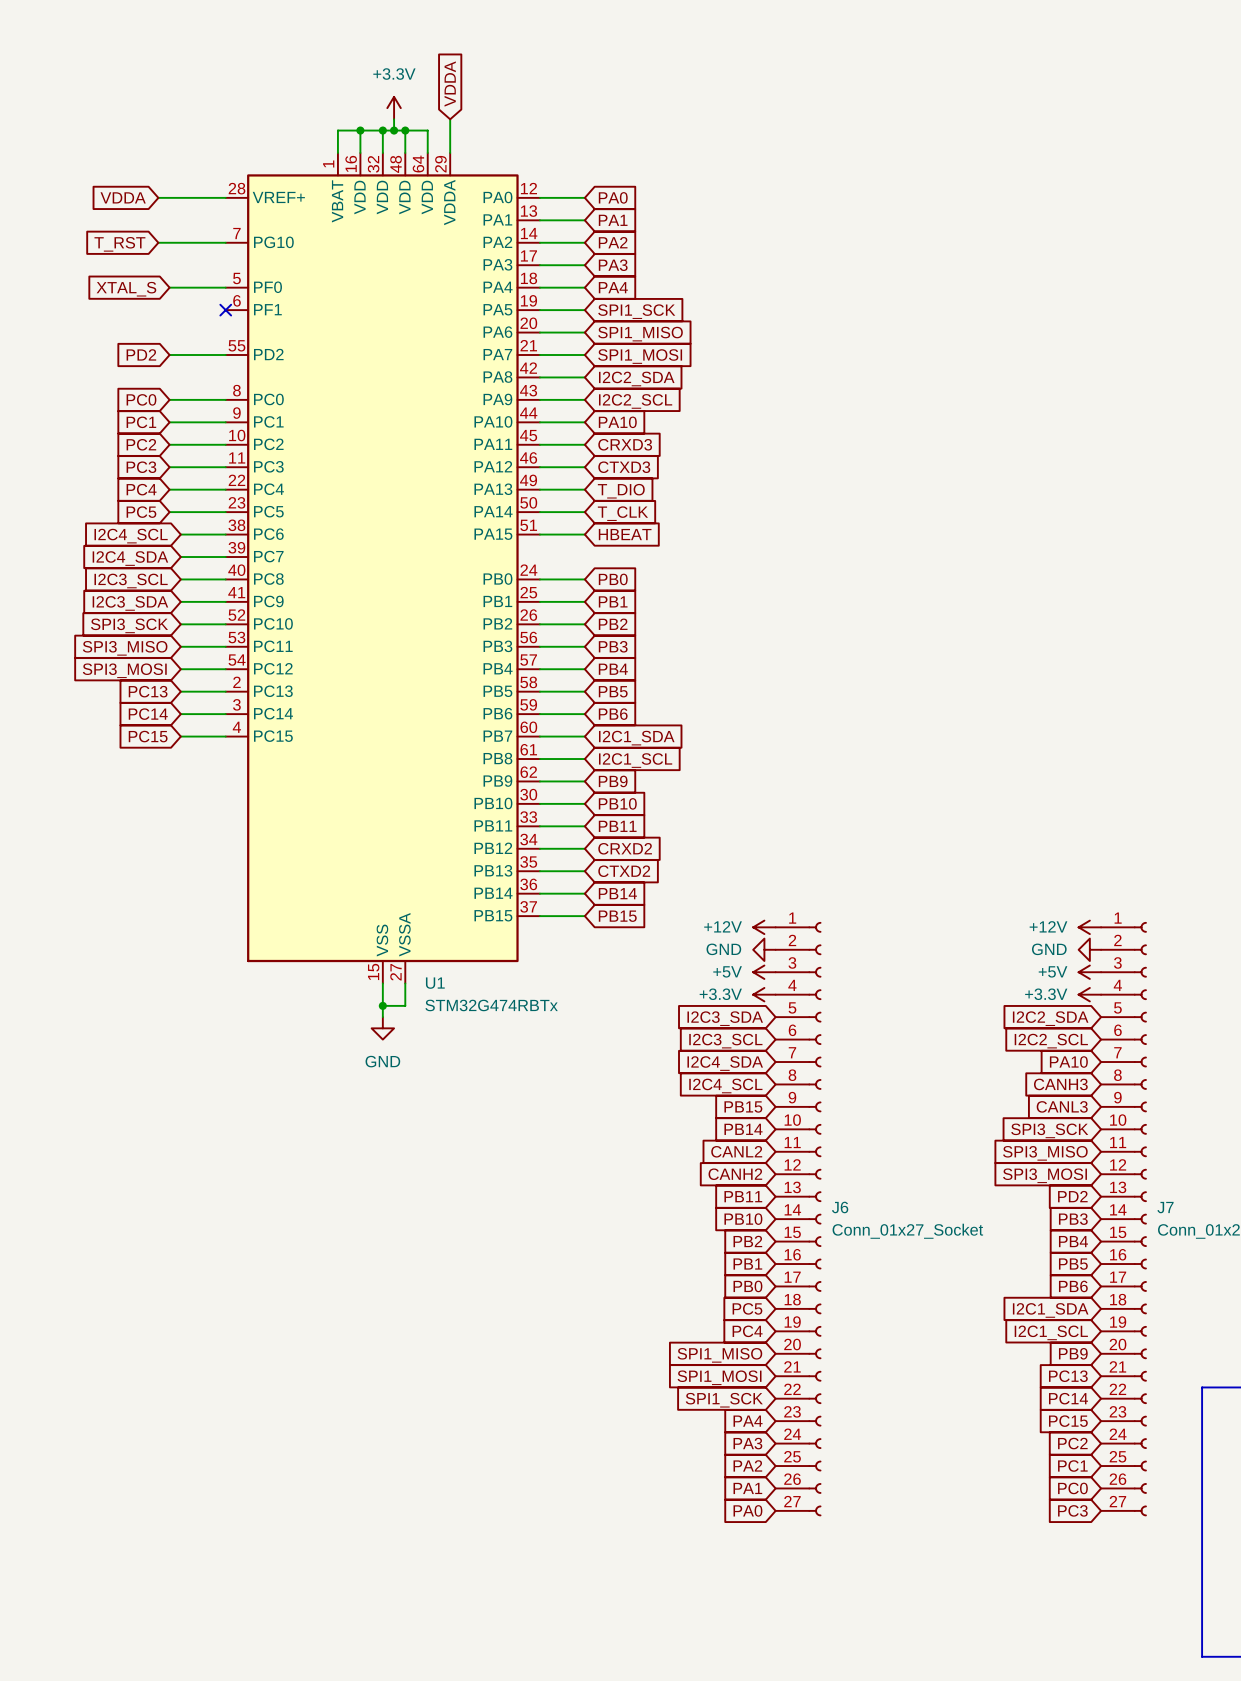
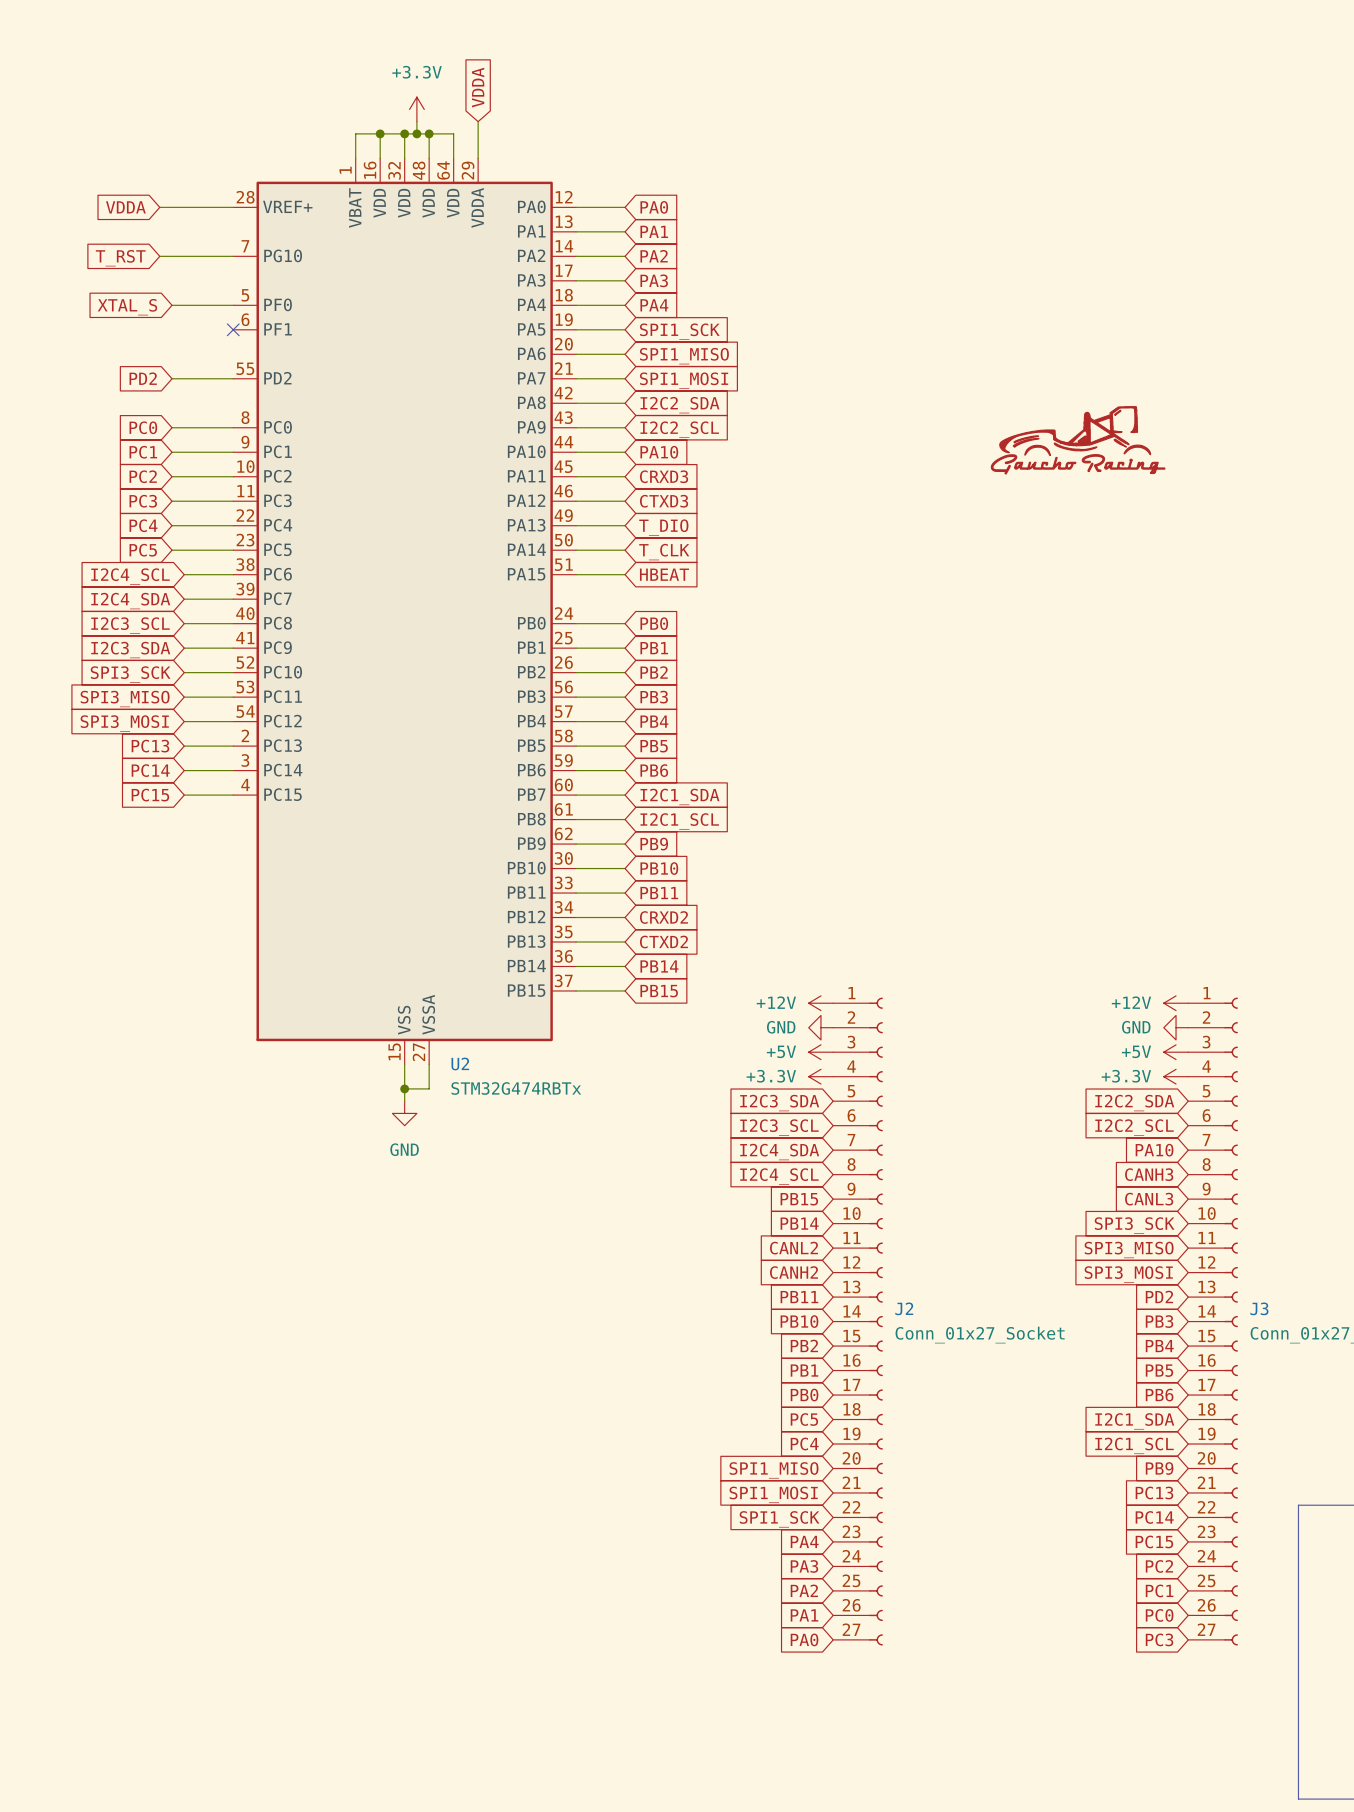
power symbol: none -> (1078, 440)
U1 name: U1 (435, 983) -> U2 (460, 1063)
J6 name: J6 (840, 1207) -> J2 (904, 1308)
J7 name: J7 (1165, 1207) -> J3 (1259, 1308)

